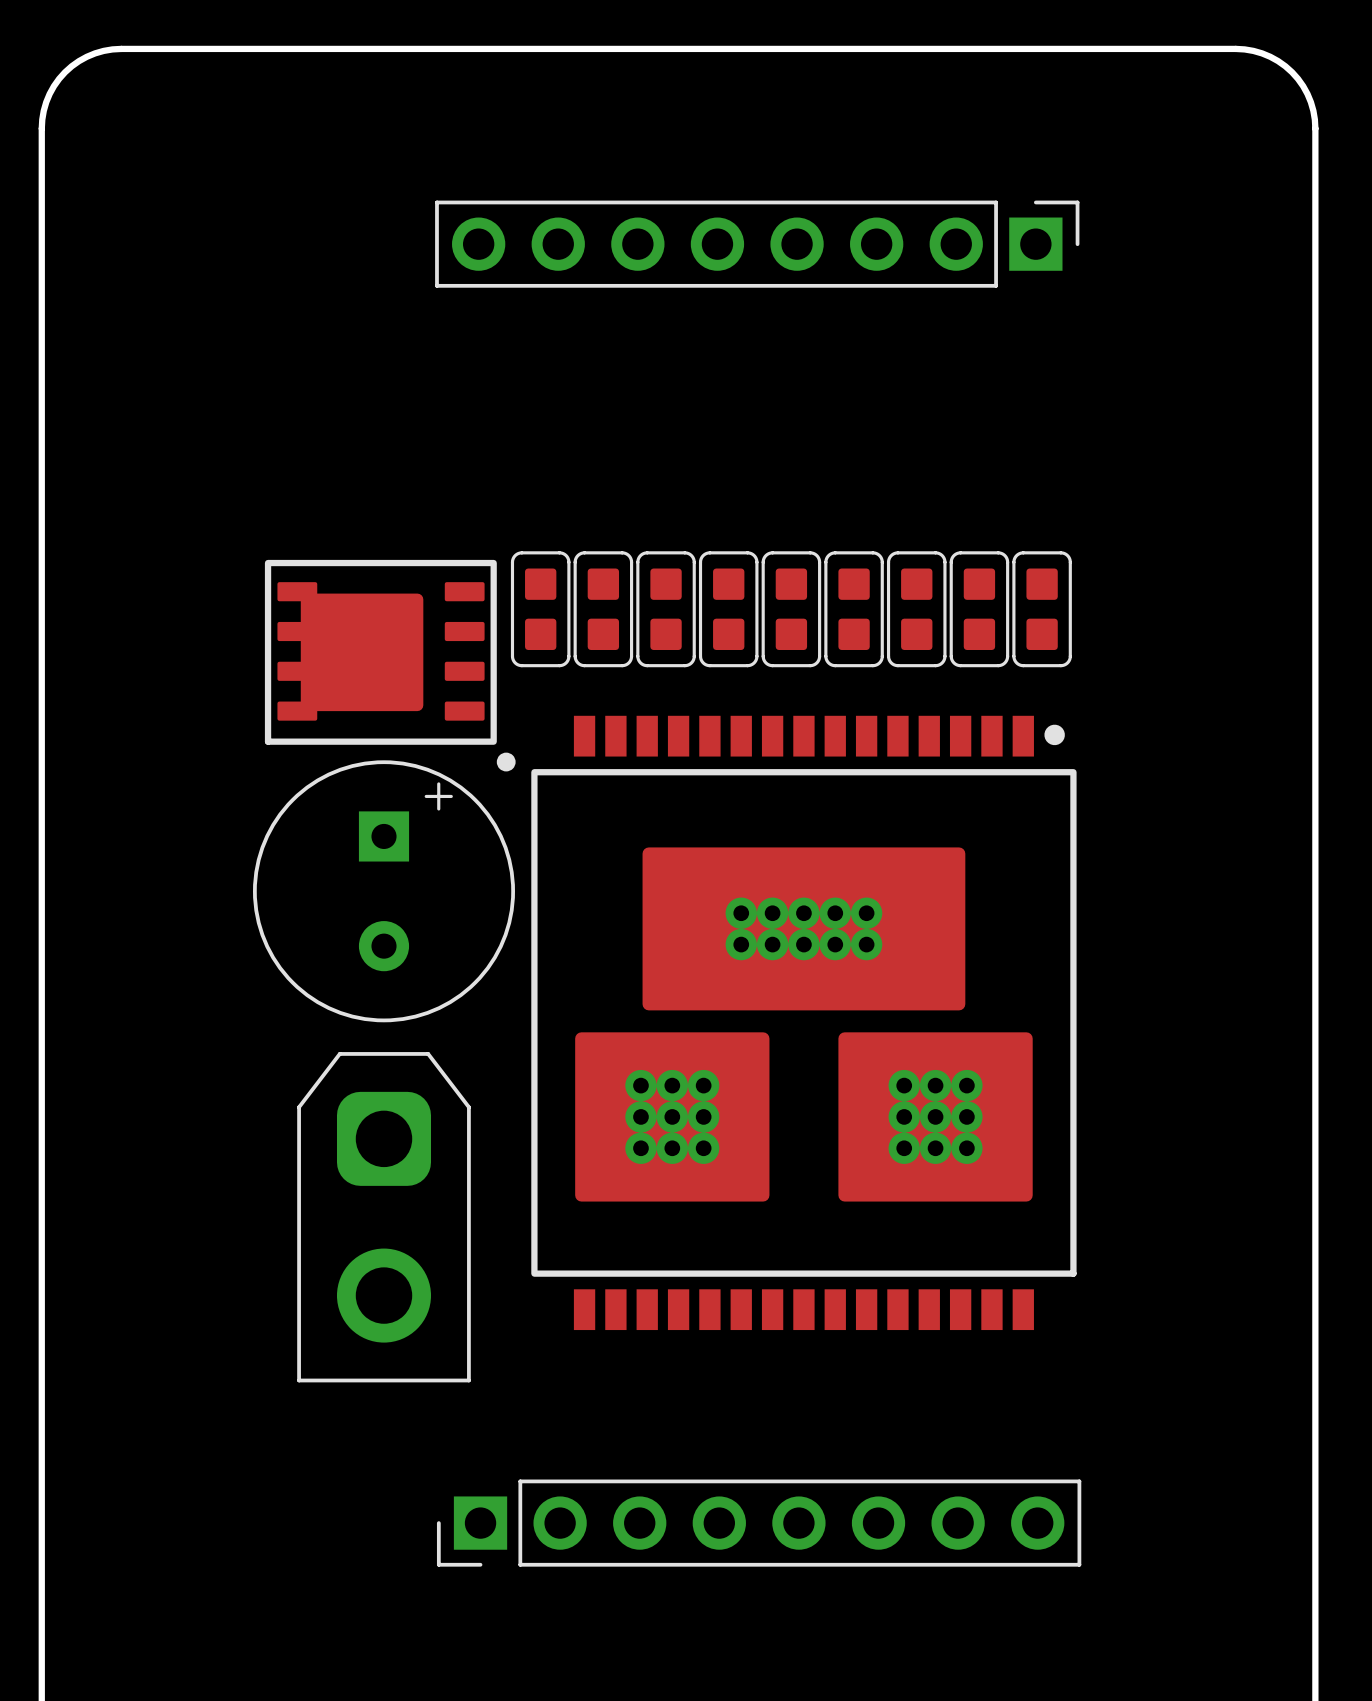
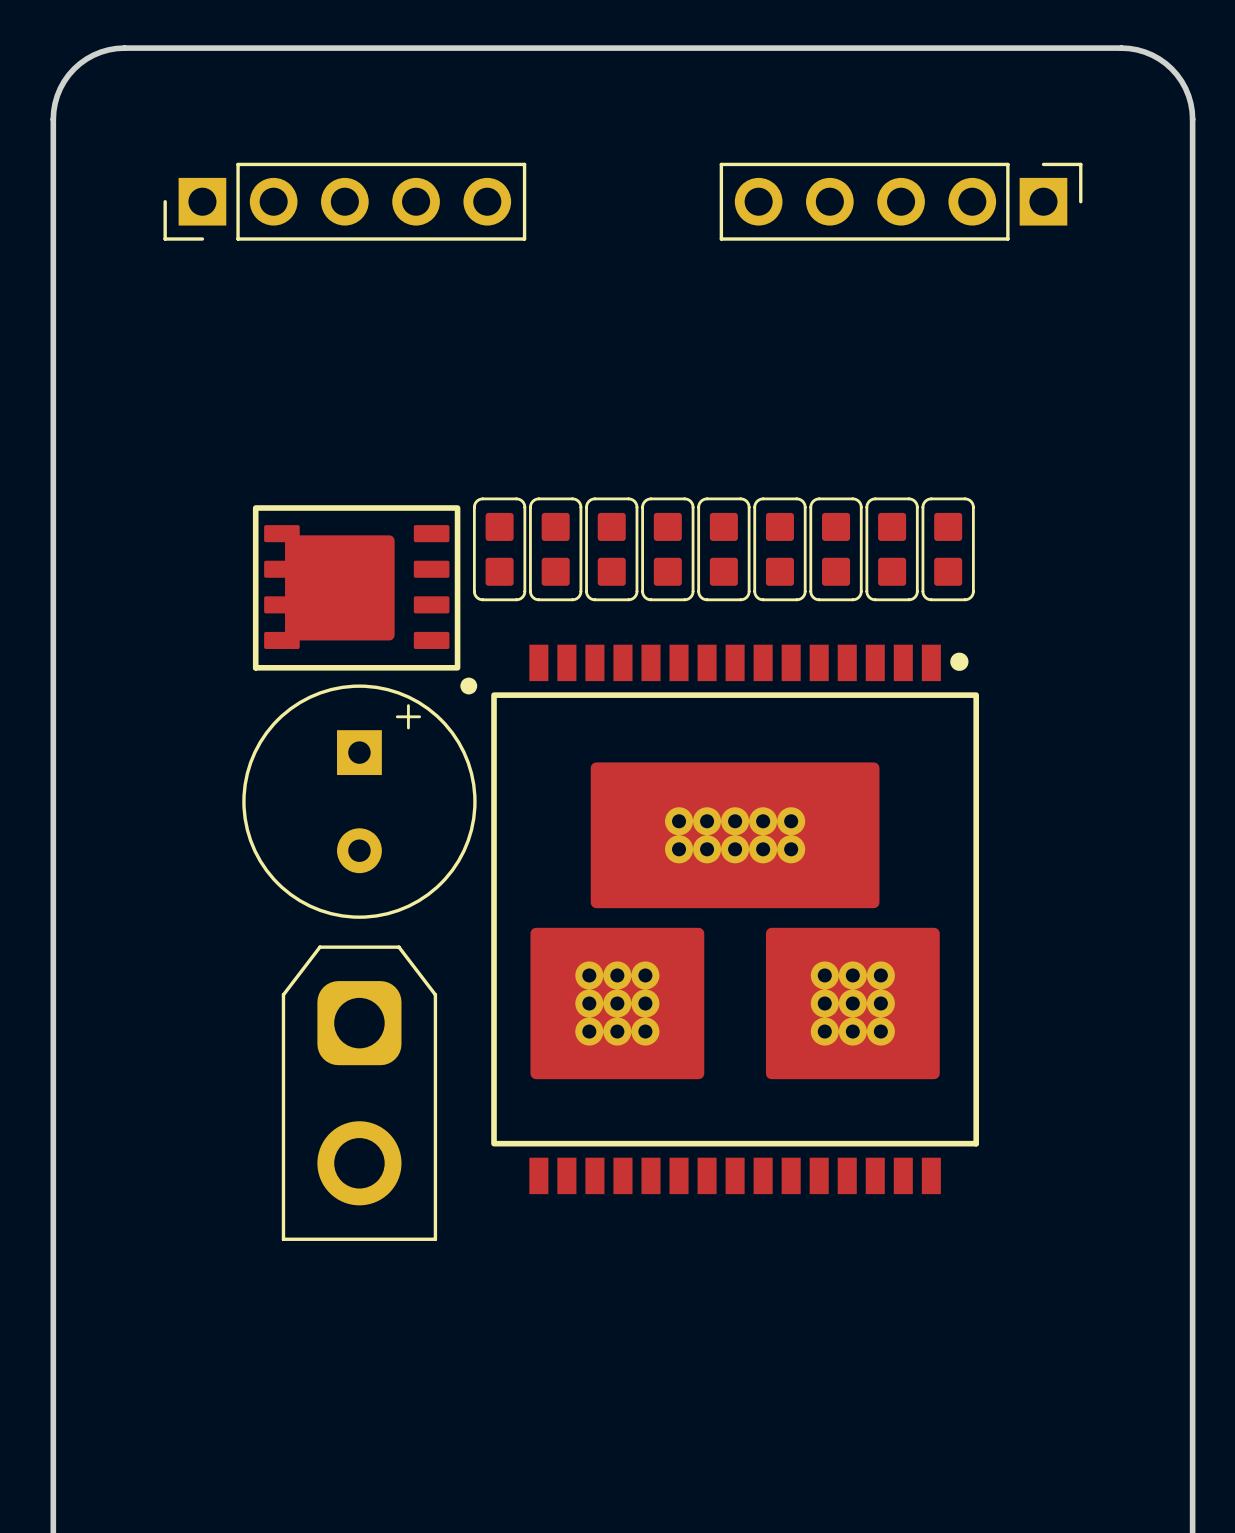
part: none -> (344, 201)
part: none -> (901, 201)
part: (757, 244) -> none
part: (759, 1523) -> none

